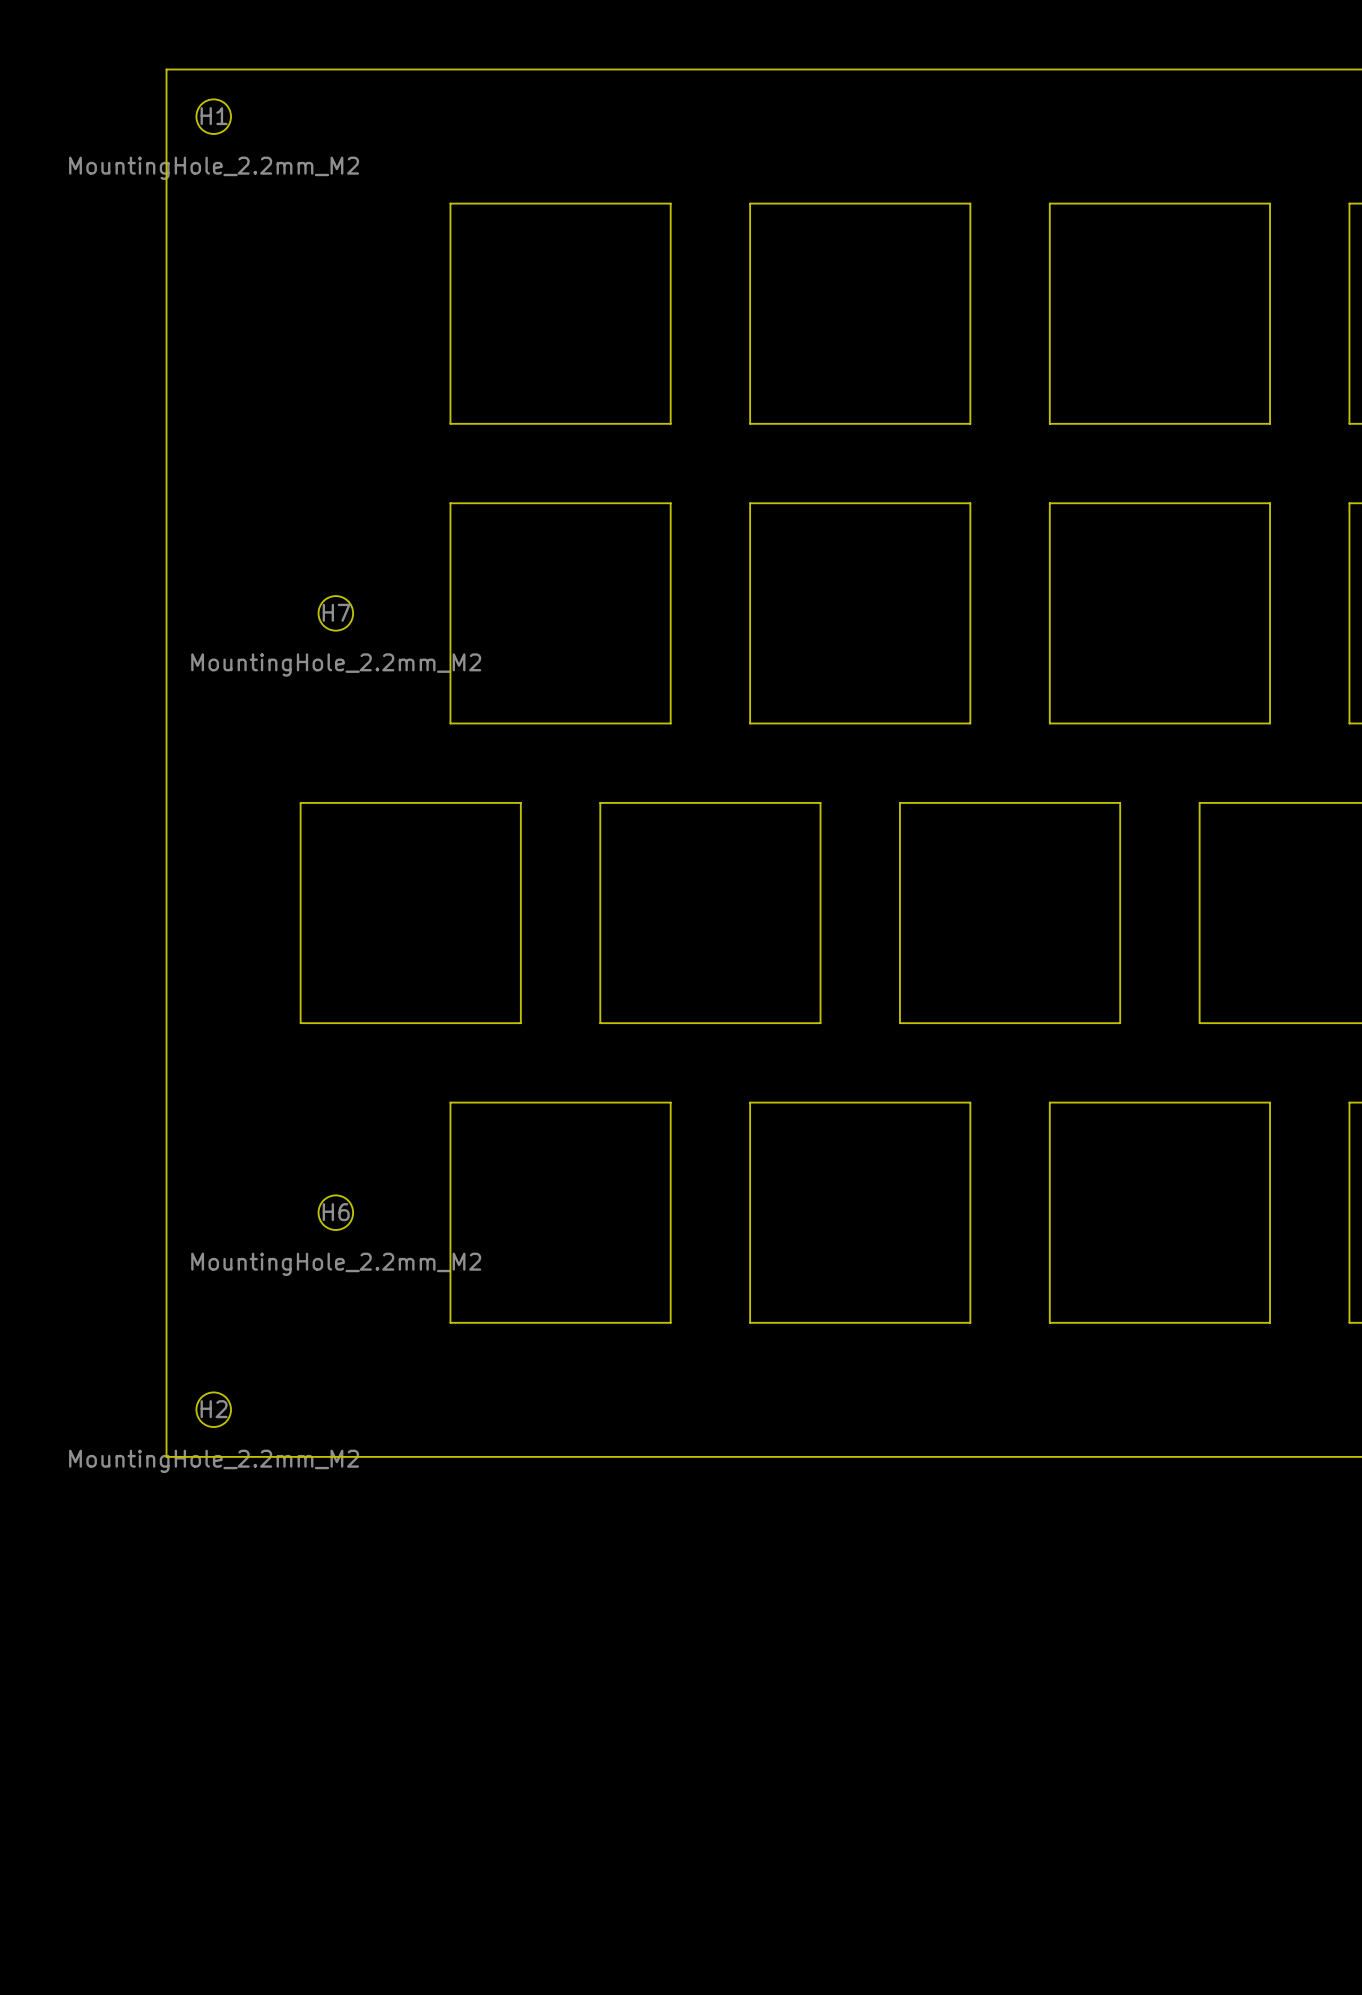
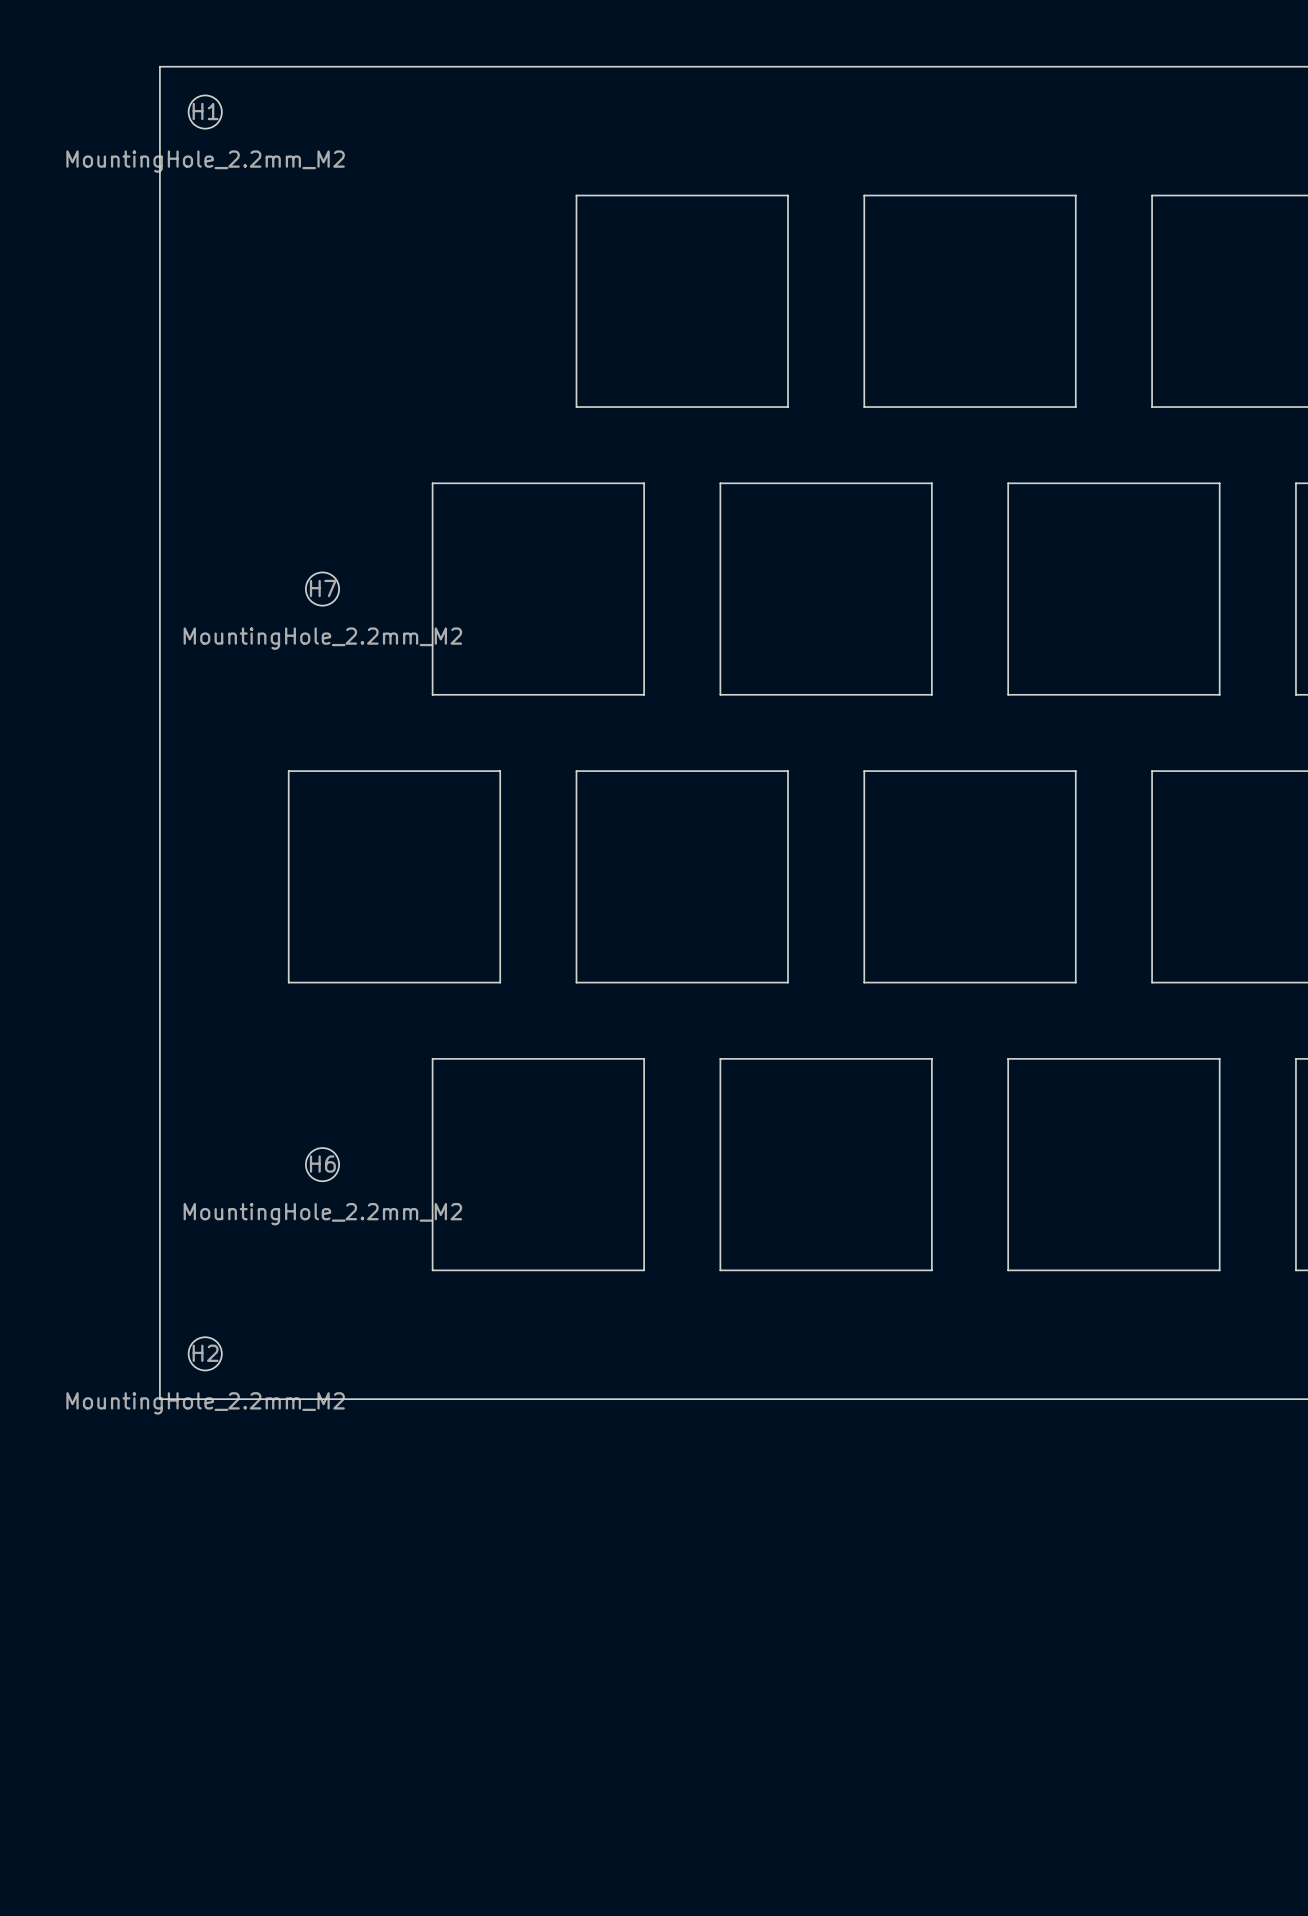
board edge: (600, 203) (450, 203) (450, 423) (600, 423) -> (576, 195) (576, 407)
board edge: (670, 203) (670, 423) -> (644, 195) (720, 195)
board edge: (750, 203) (750, 423) -> (644, 407) (720, 407)
board edge: (820, 203) (899, 203) -> (787, 195) (787, 407)
board edge: (970, 203) (970, 423) -> (931, 195) (1008, 195)
board edge: (1049, 203) (1049, 423) -> (931, 407) (1008, 407)
board edge: (1120, 203) (1199, 203) -> (1075, 195) (1075, 407)
board edge: (1270, 203) (1270, 423) -> (1219, 195) (1295, 195)
board edge: (1349, 203) (1349, 423) -> (1219, 407) (1295, 407)
board edge: (820, 423) (899, 423) -> (864, 195) (864, 407)
board edge: (1120, 423) (1199, 423) -> (1152, 195) (1152, 407)

